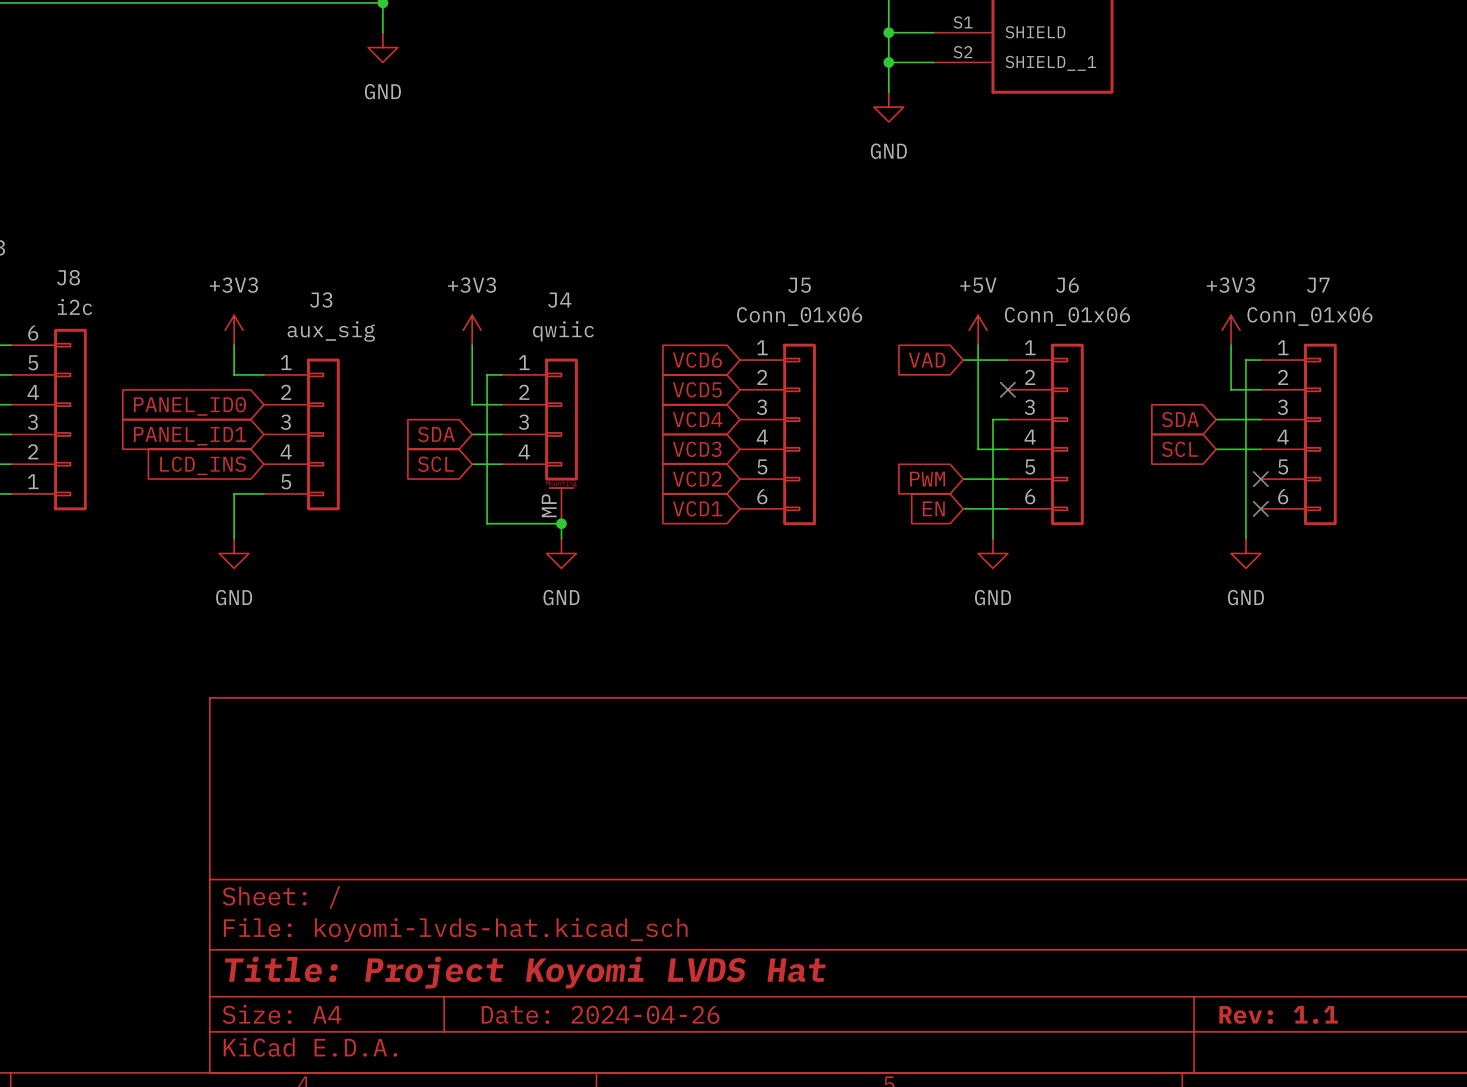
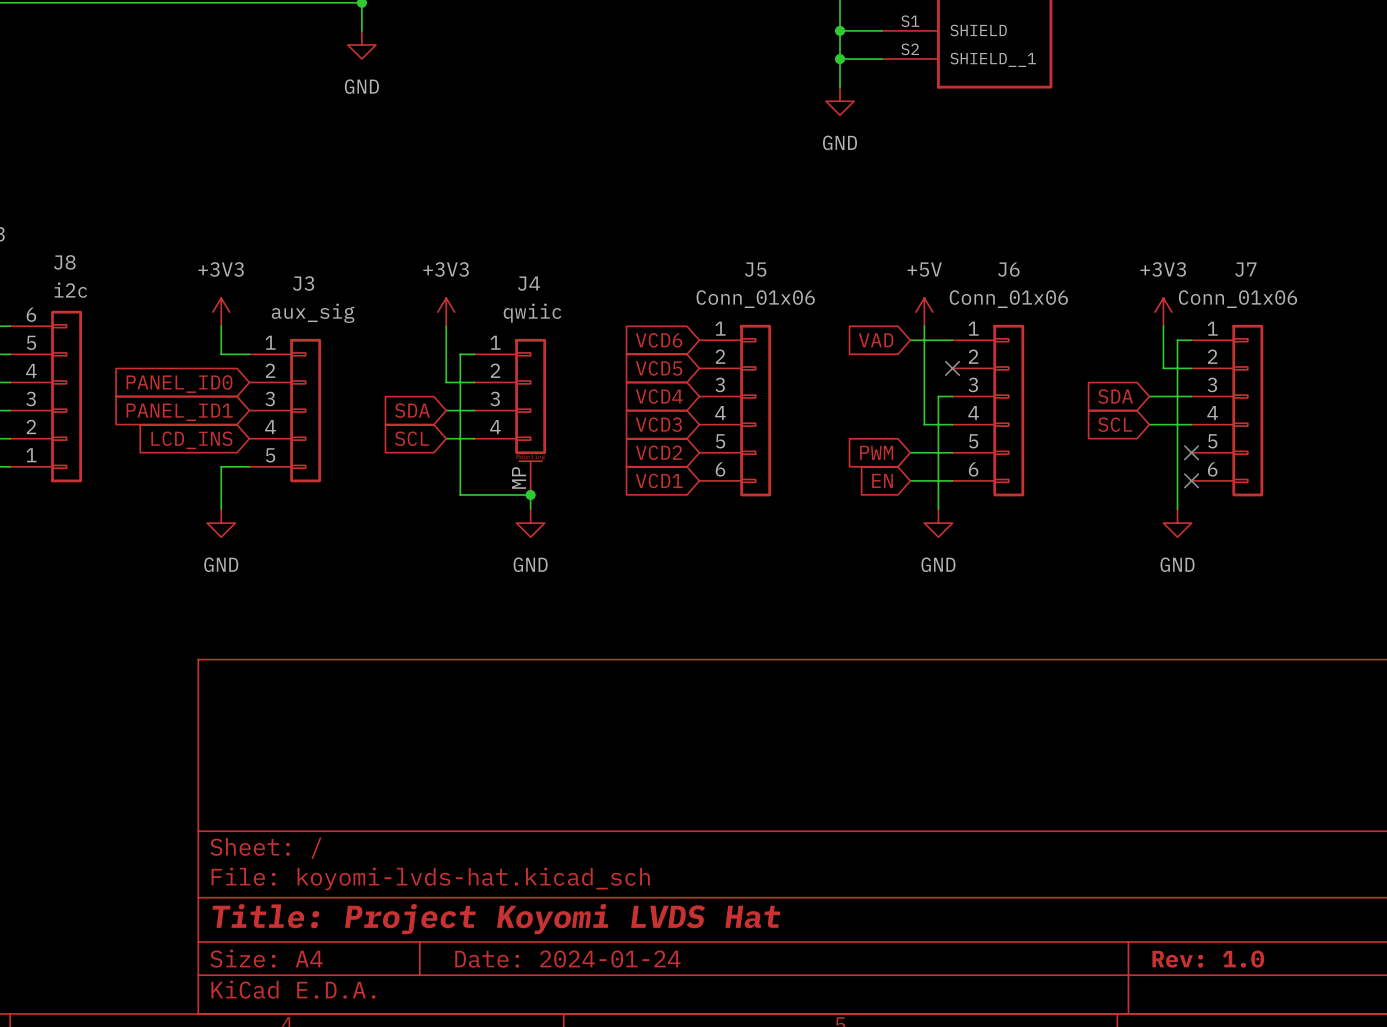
title block: Date: 2024-04-26 (600, 1014) -> Date: 2024-01-24 (567, 959)
title block: Rev: 1.1 (1278, 1014) -> Rev: 1.0 (1208, 959)

